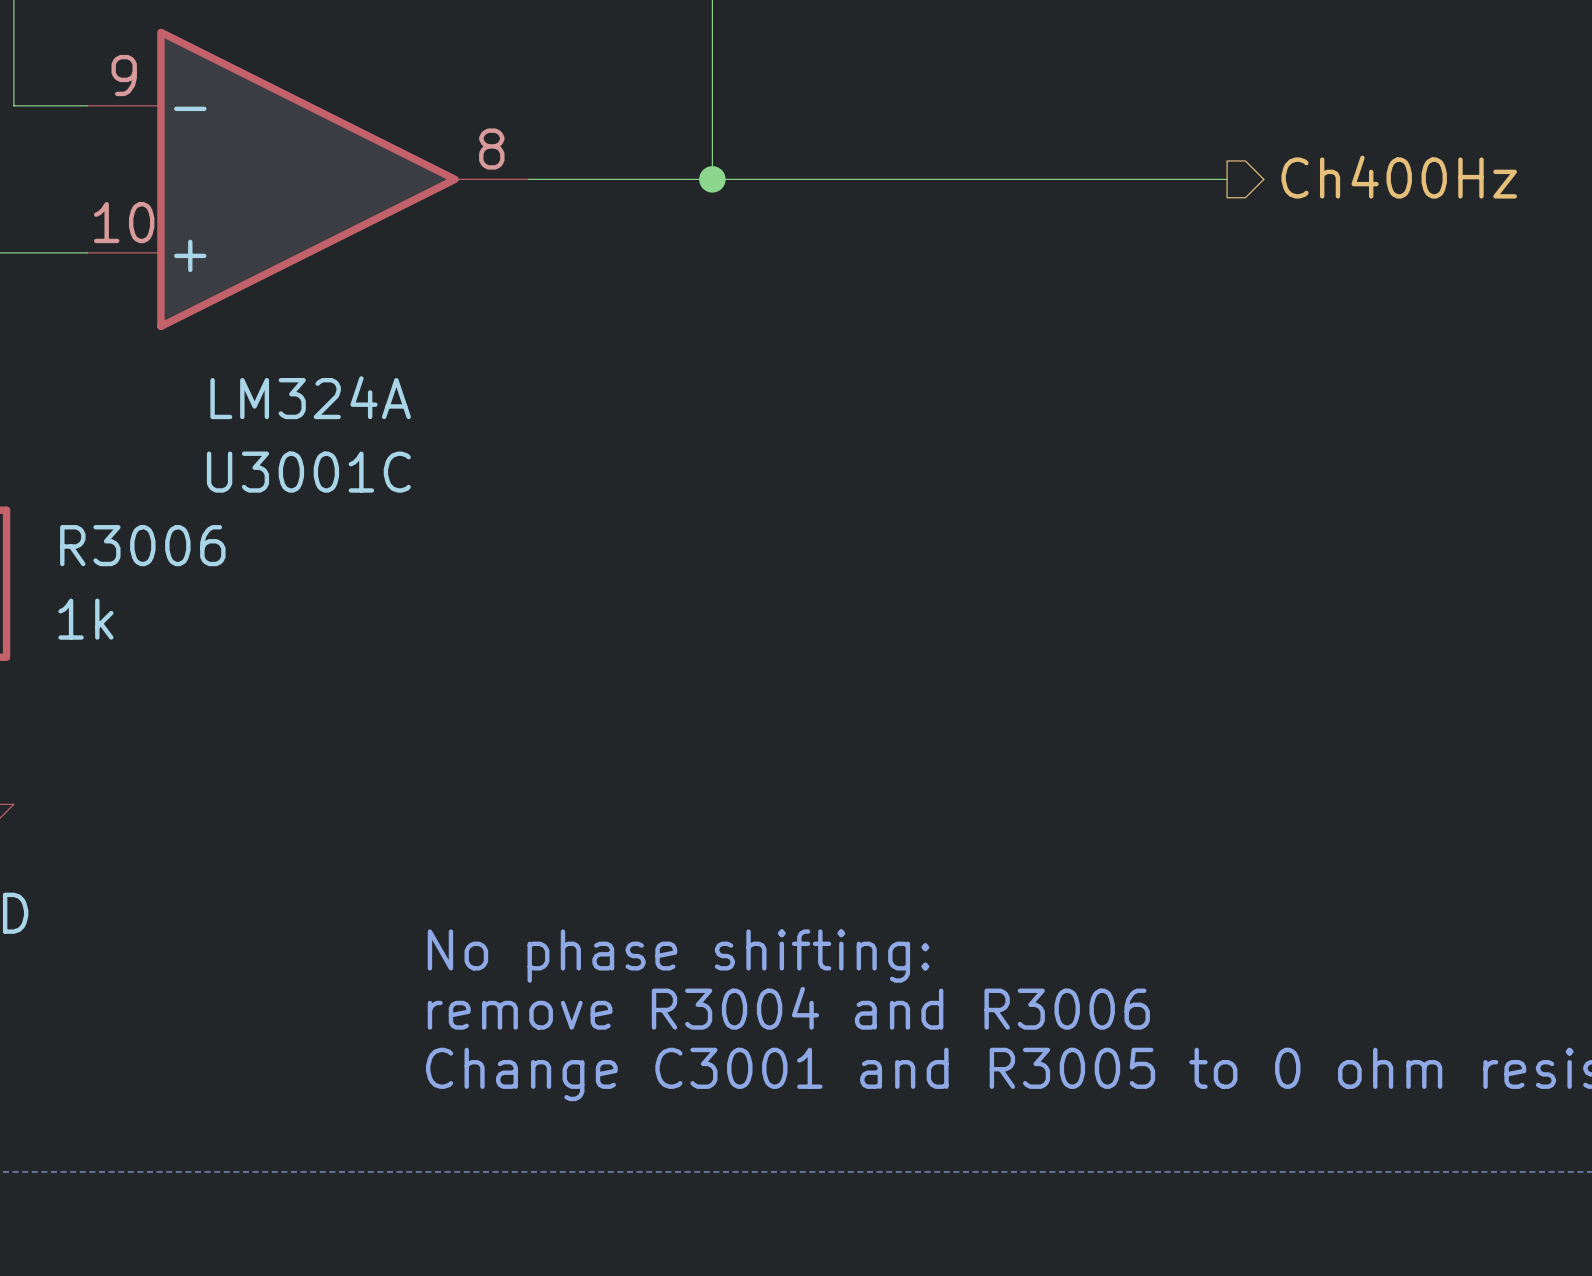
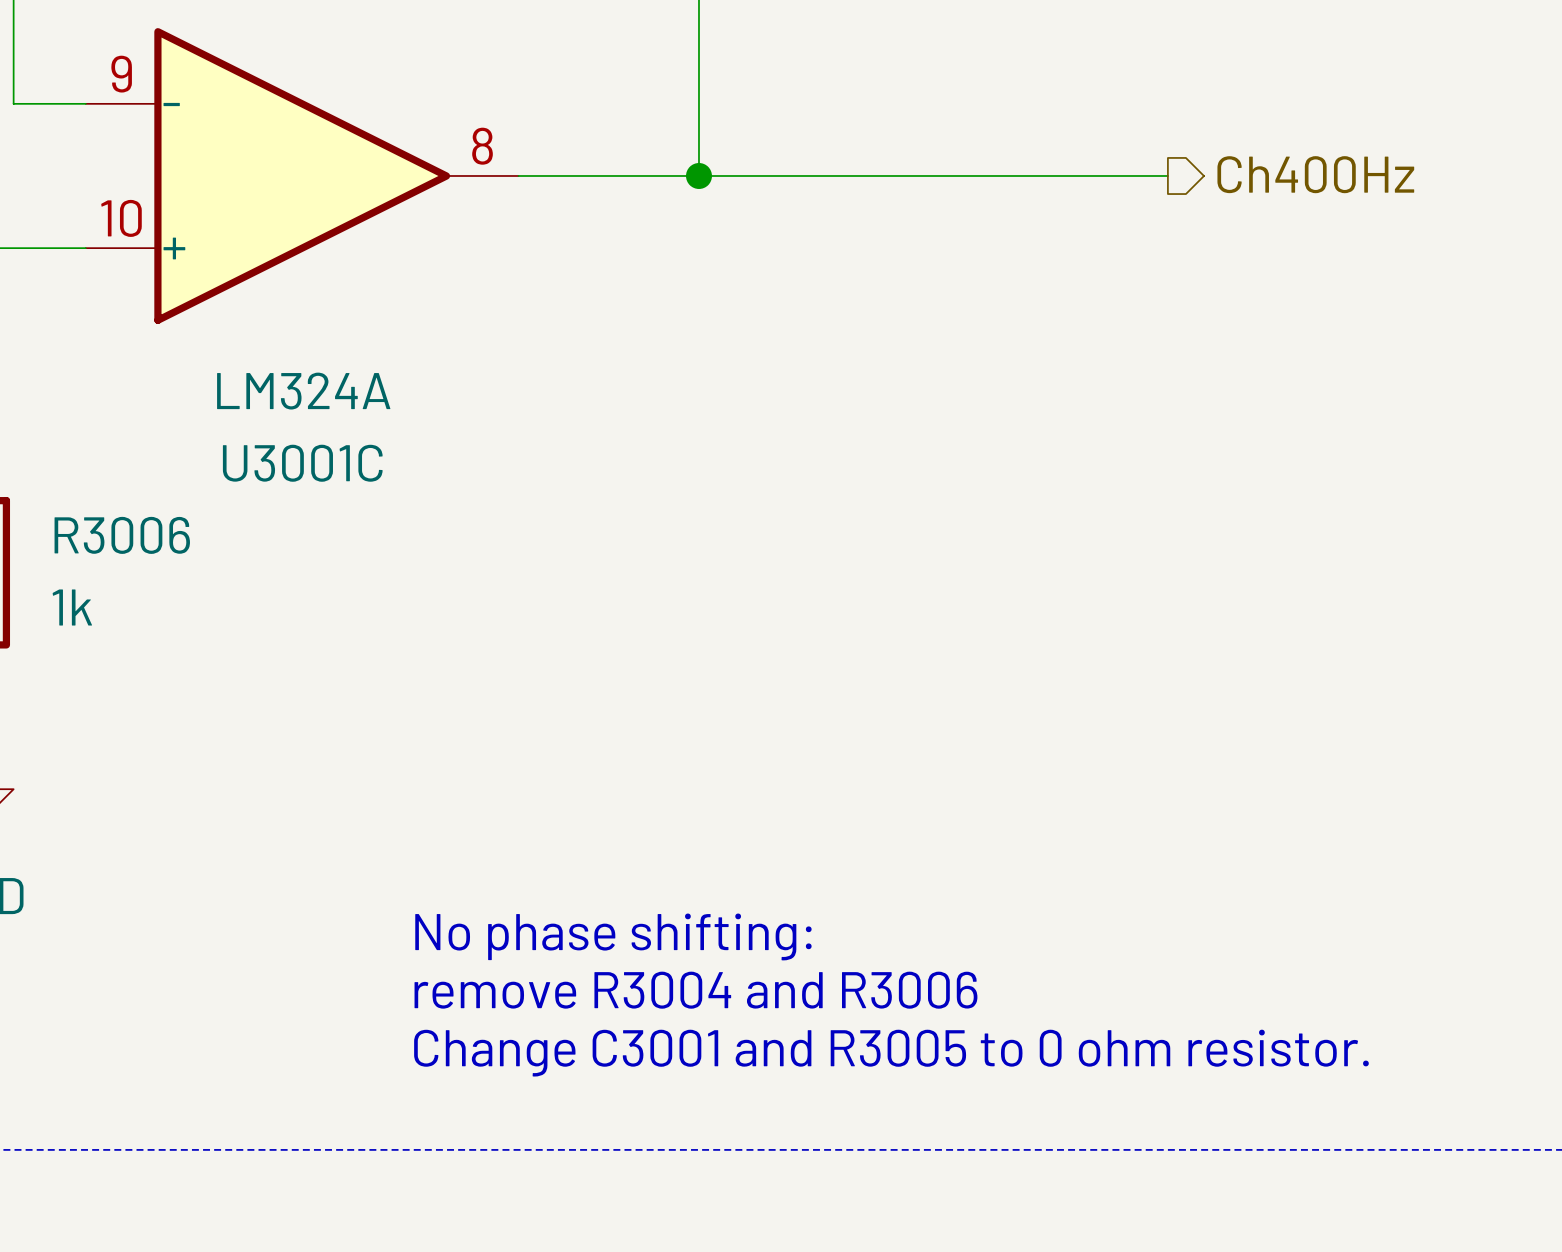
hierarchical label position: Ch400Hz (1399, 177) -> Ch400Hz (1315, 174)
wire: (1190, 179) (1227, 179) -> none

